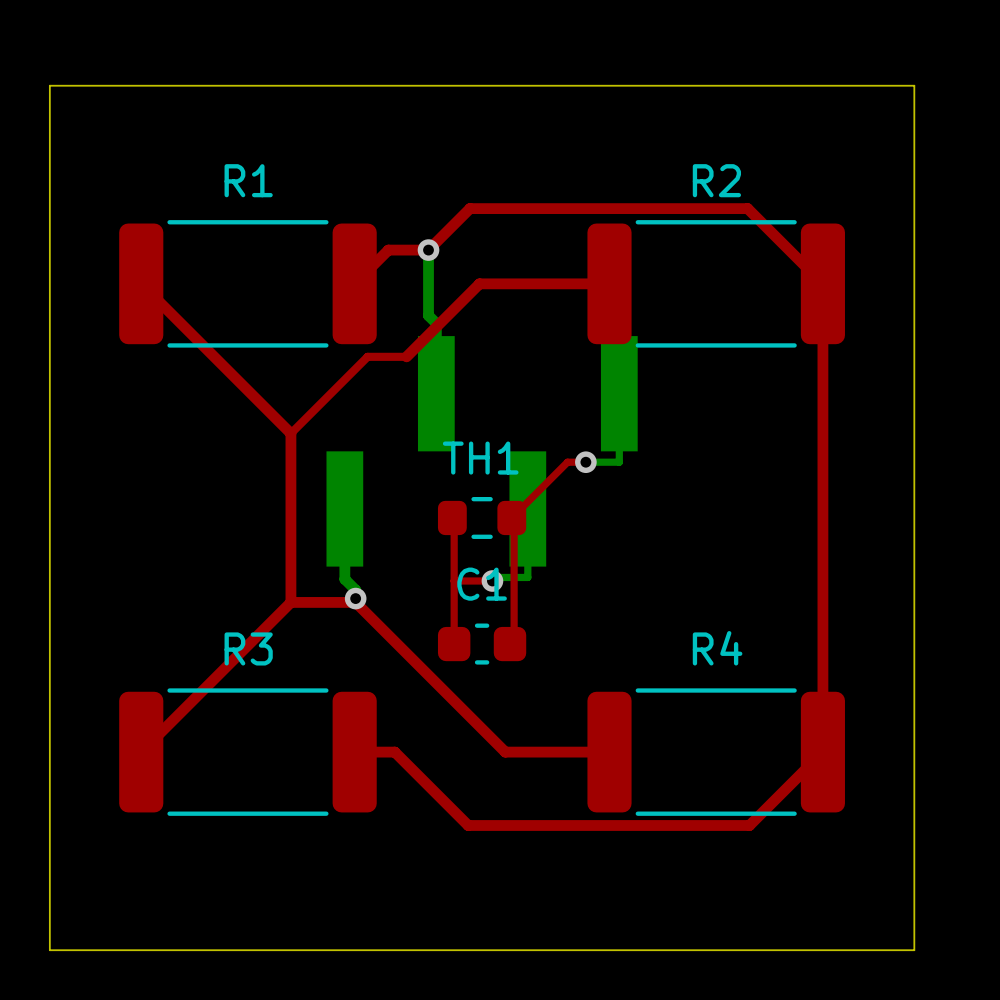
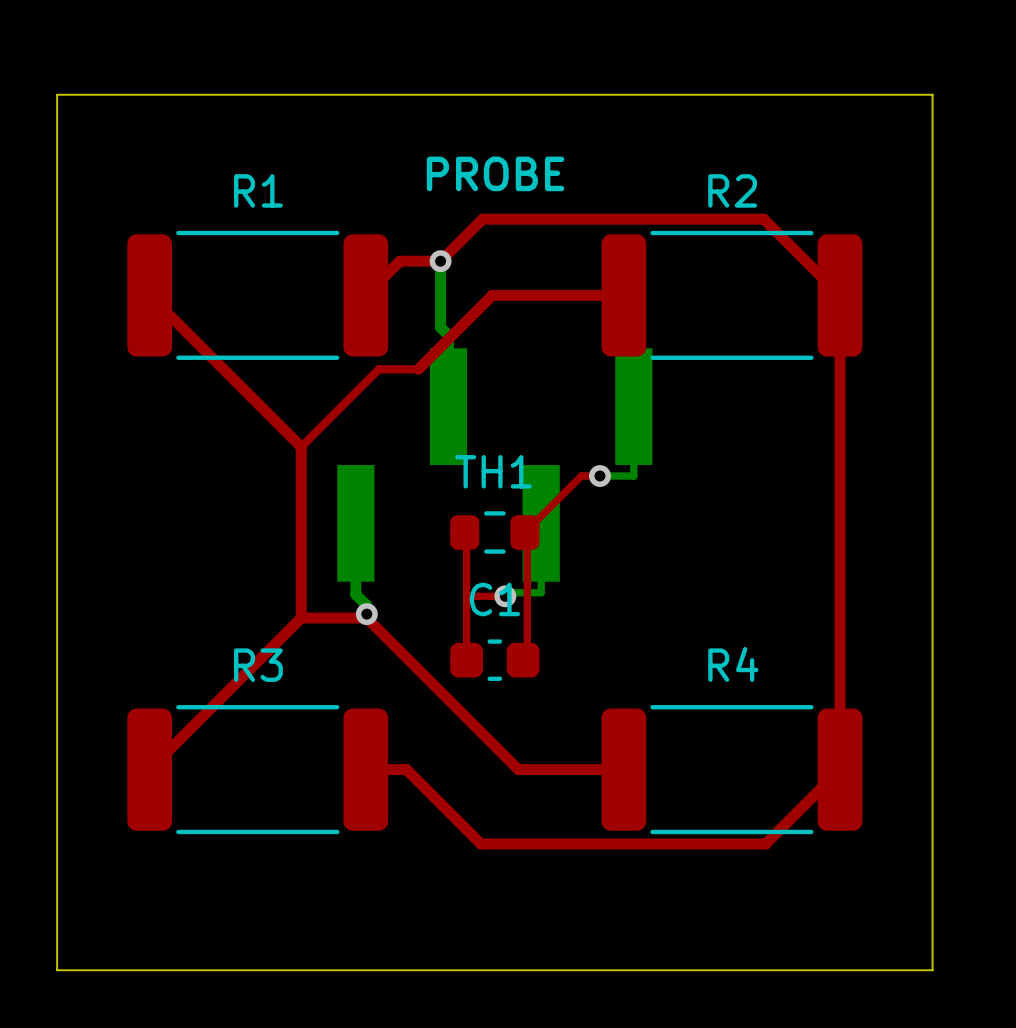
text: none -> PROBE (495, 173)

